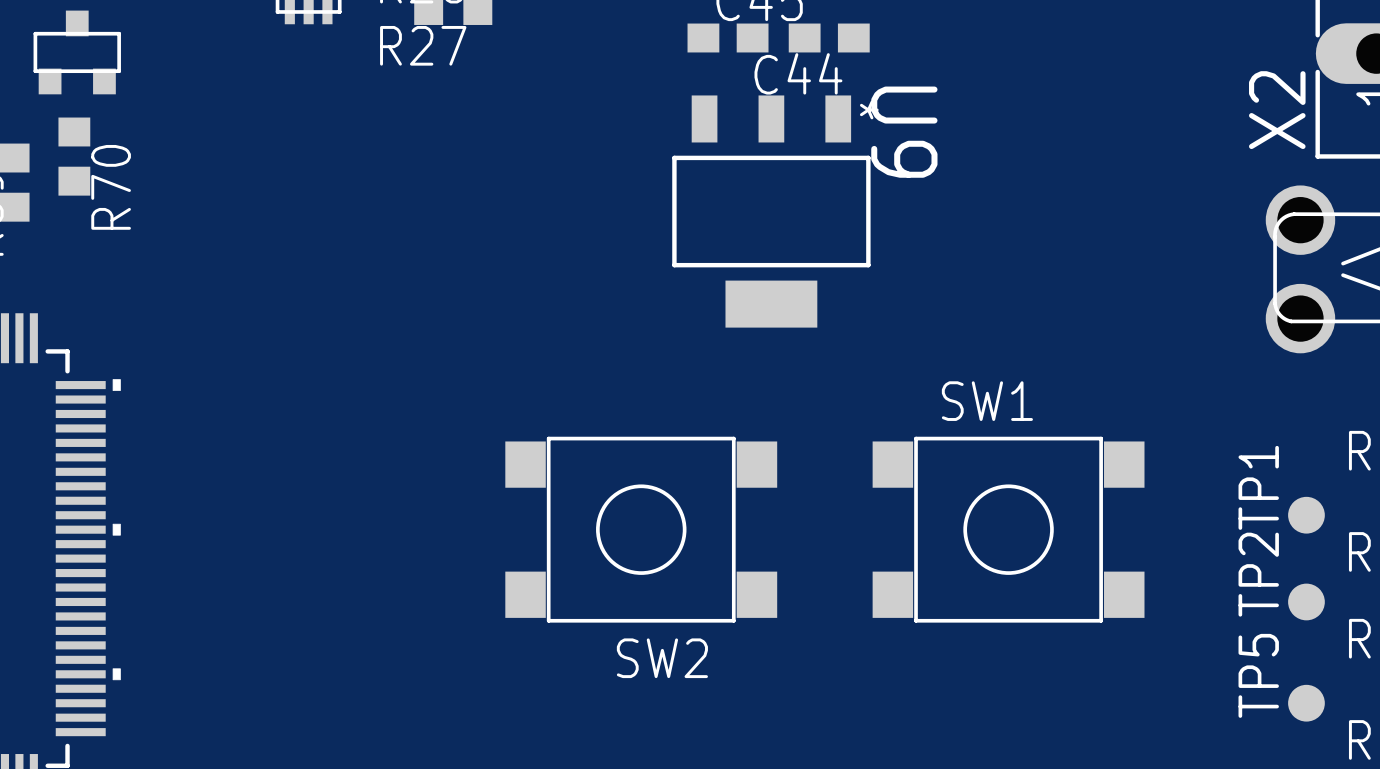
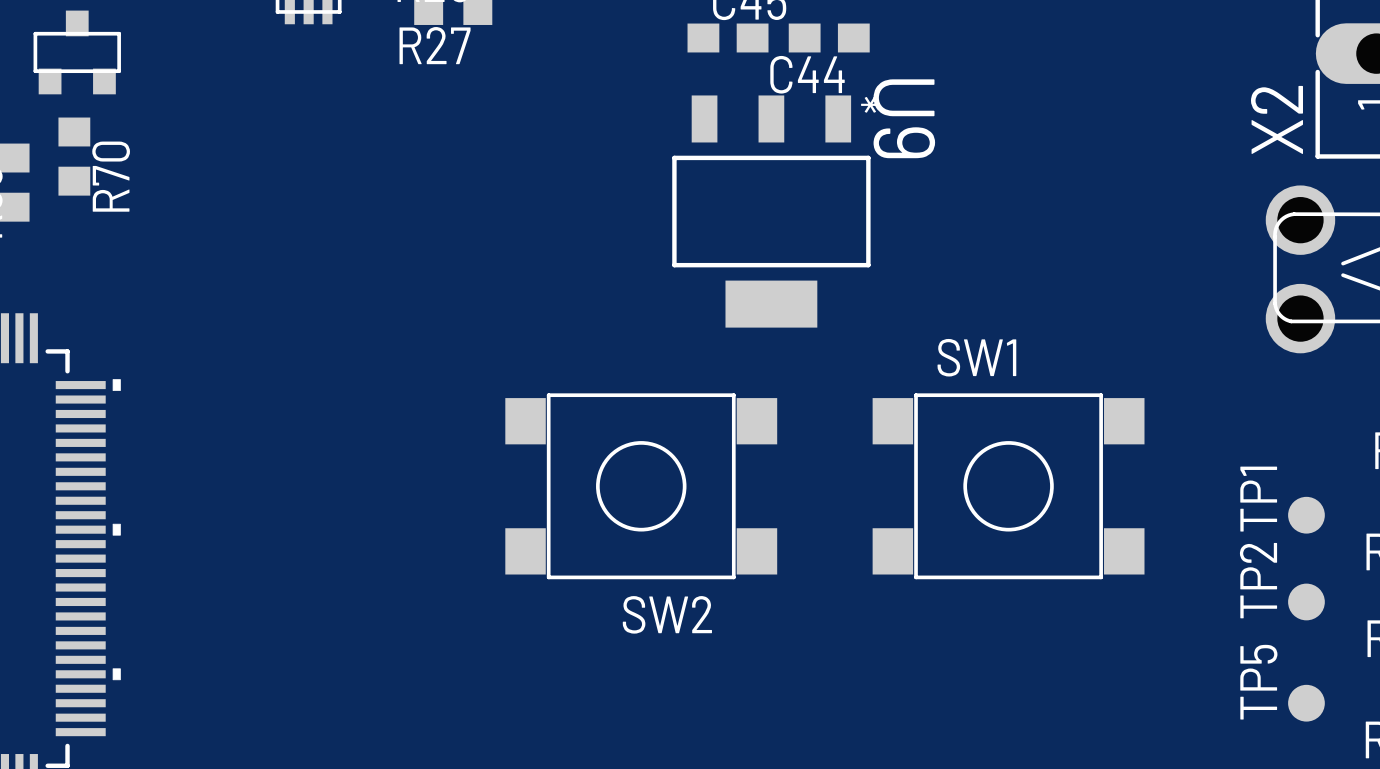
SW2 position: (641, 529) -> (641, 486)
SW1 position: (1008, 529) -> (1008, 486)

